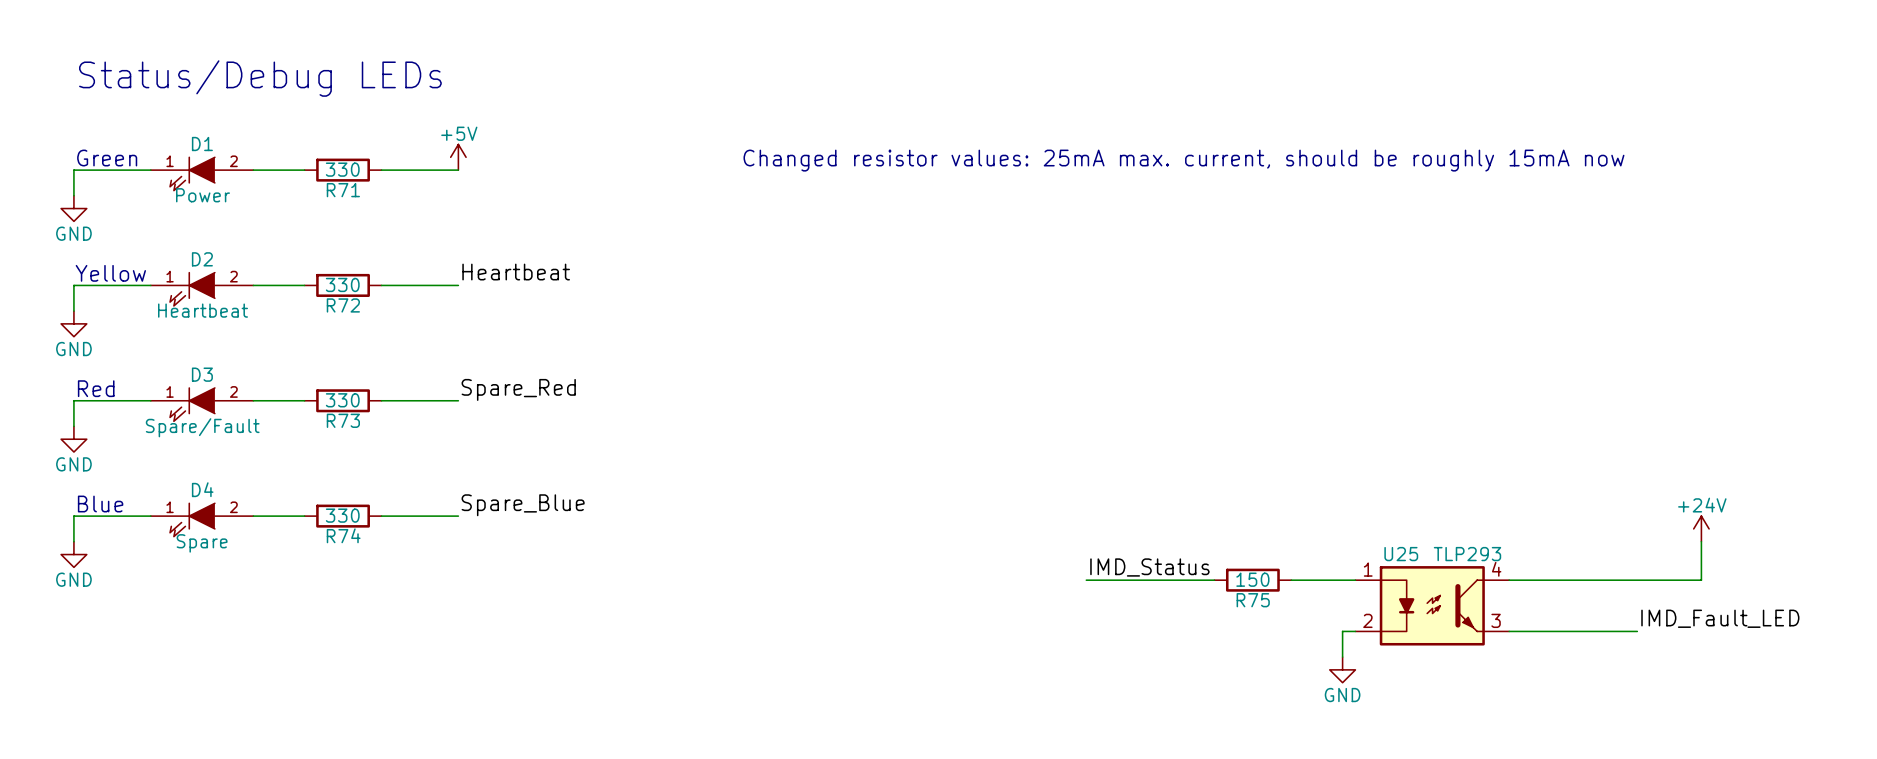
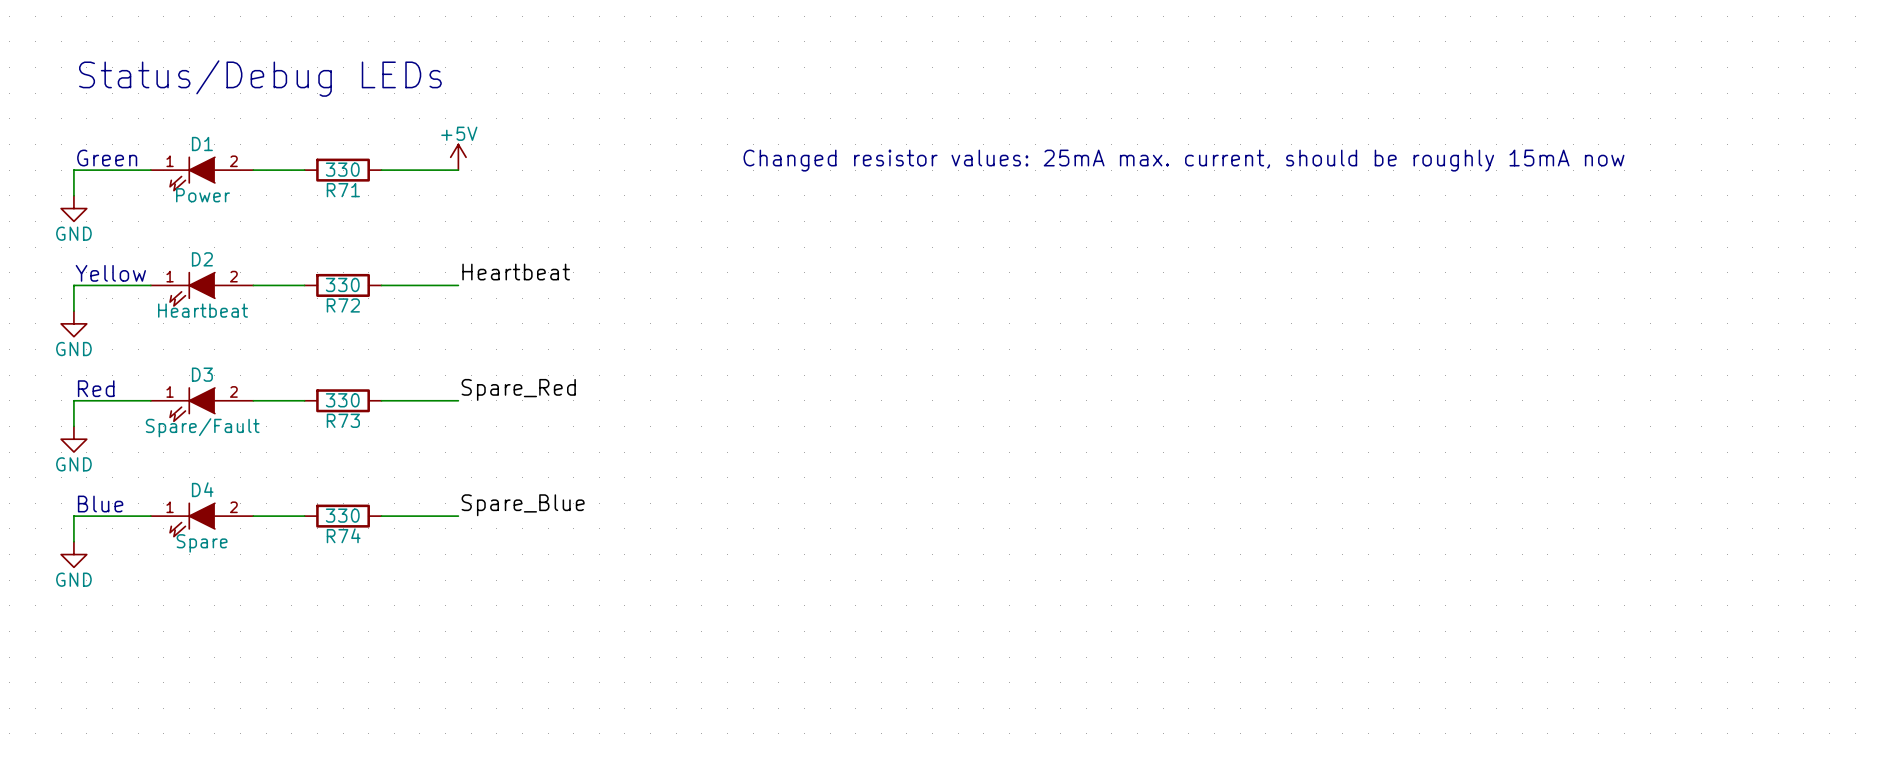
power symbol: +24V (1701, 528) -> none
wire: (1701, 541) (1701, 580) (1509, 580) -> none
label: IMD_Status (1149, 567) -> none
wire: (1086, 580) (1214, 580) -> none
R75: 150 (1252, 580) -> none
wire: (1291, 580) (1355, 580) -> none
U25: TLP293 (1432, 605) -> none
label: IMD_Fault_LED (1720, 618) -> none
wire: (1355, 631) (1342, 631) (1342, 657) -> none
wire: (1509, 631) (1637, 631) -> none
power symbol: GND (1342, 669) -> none

